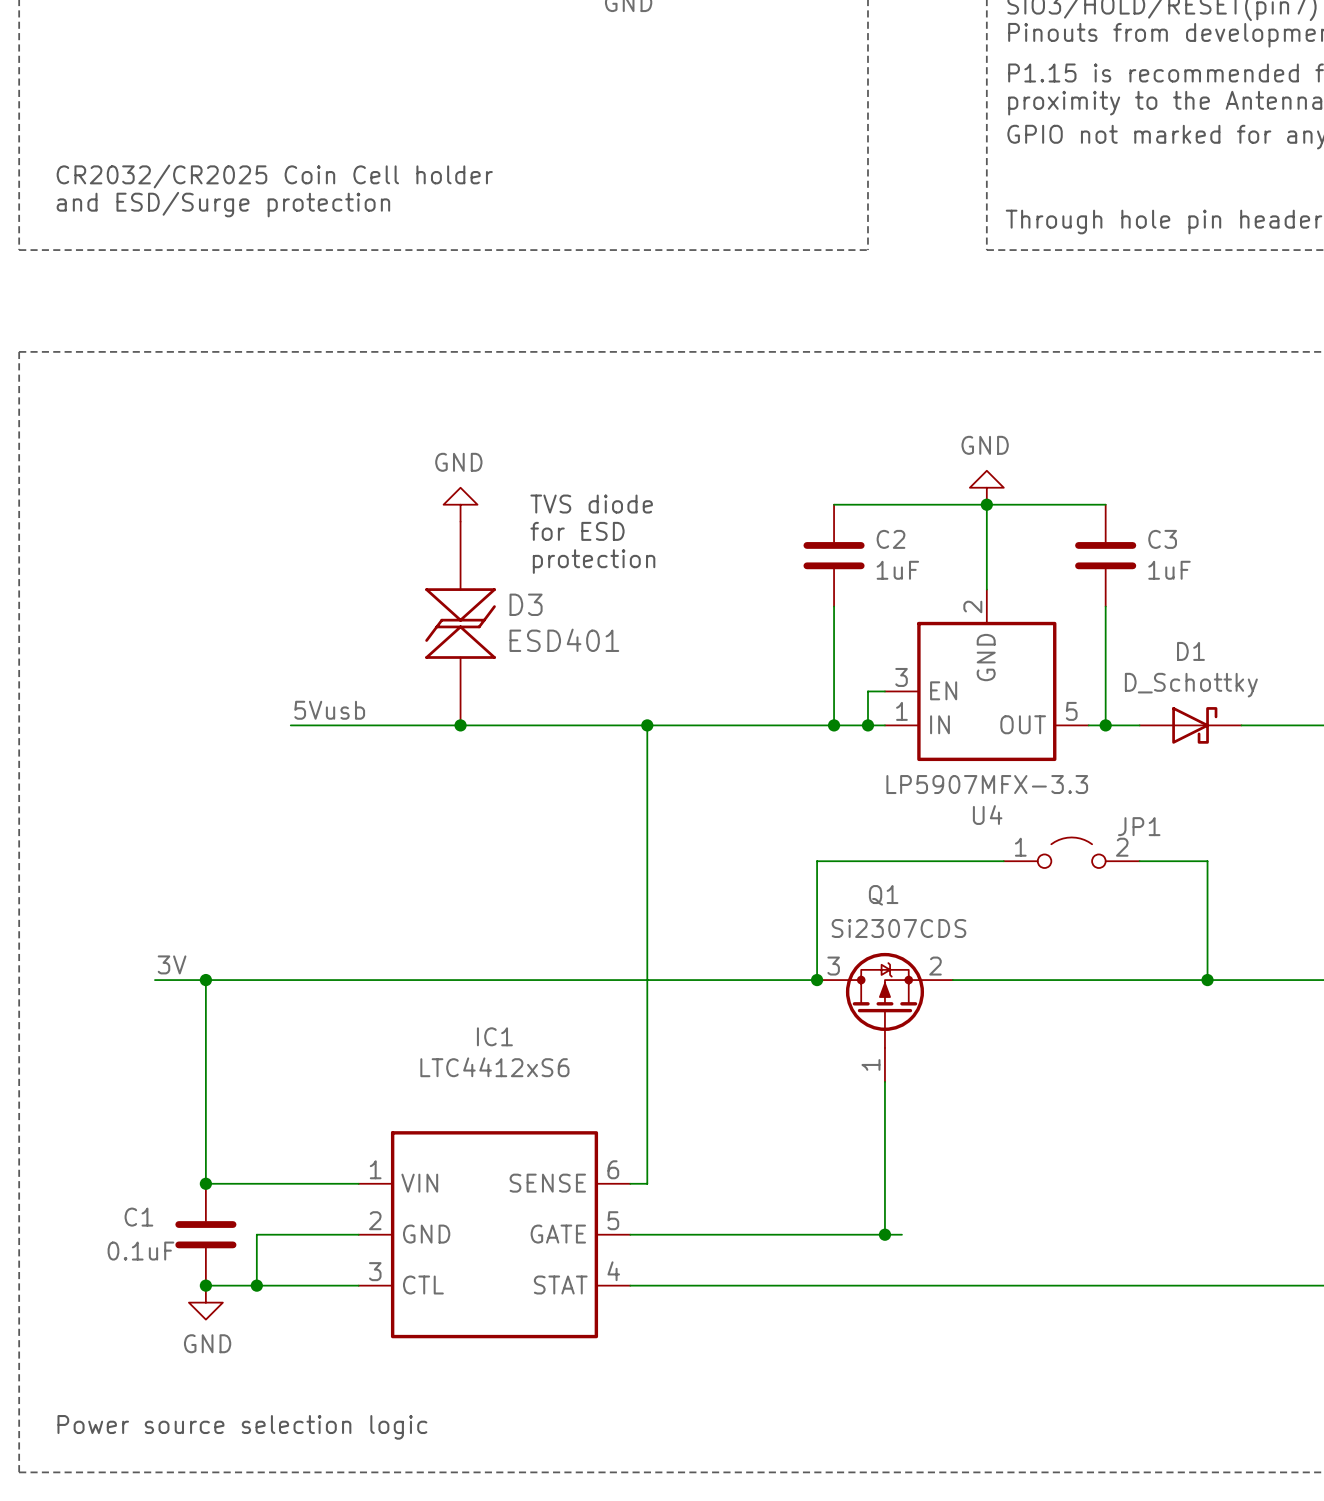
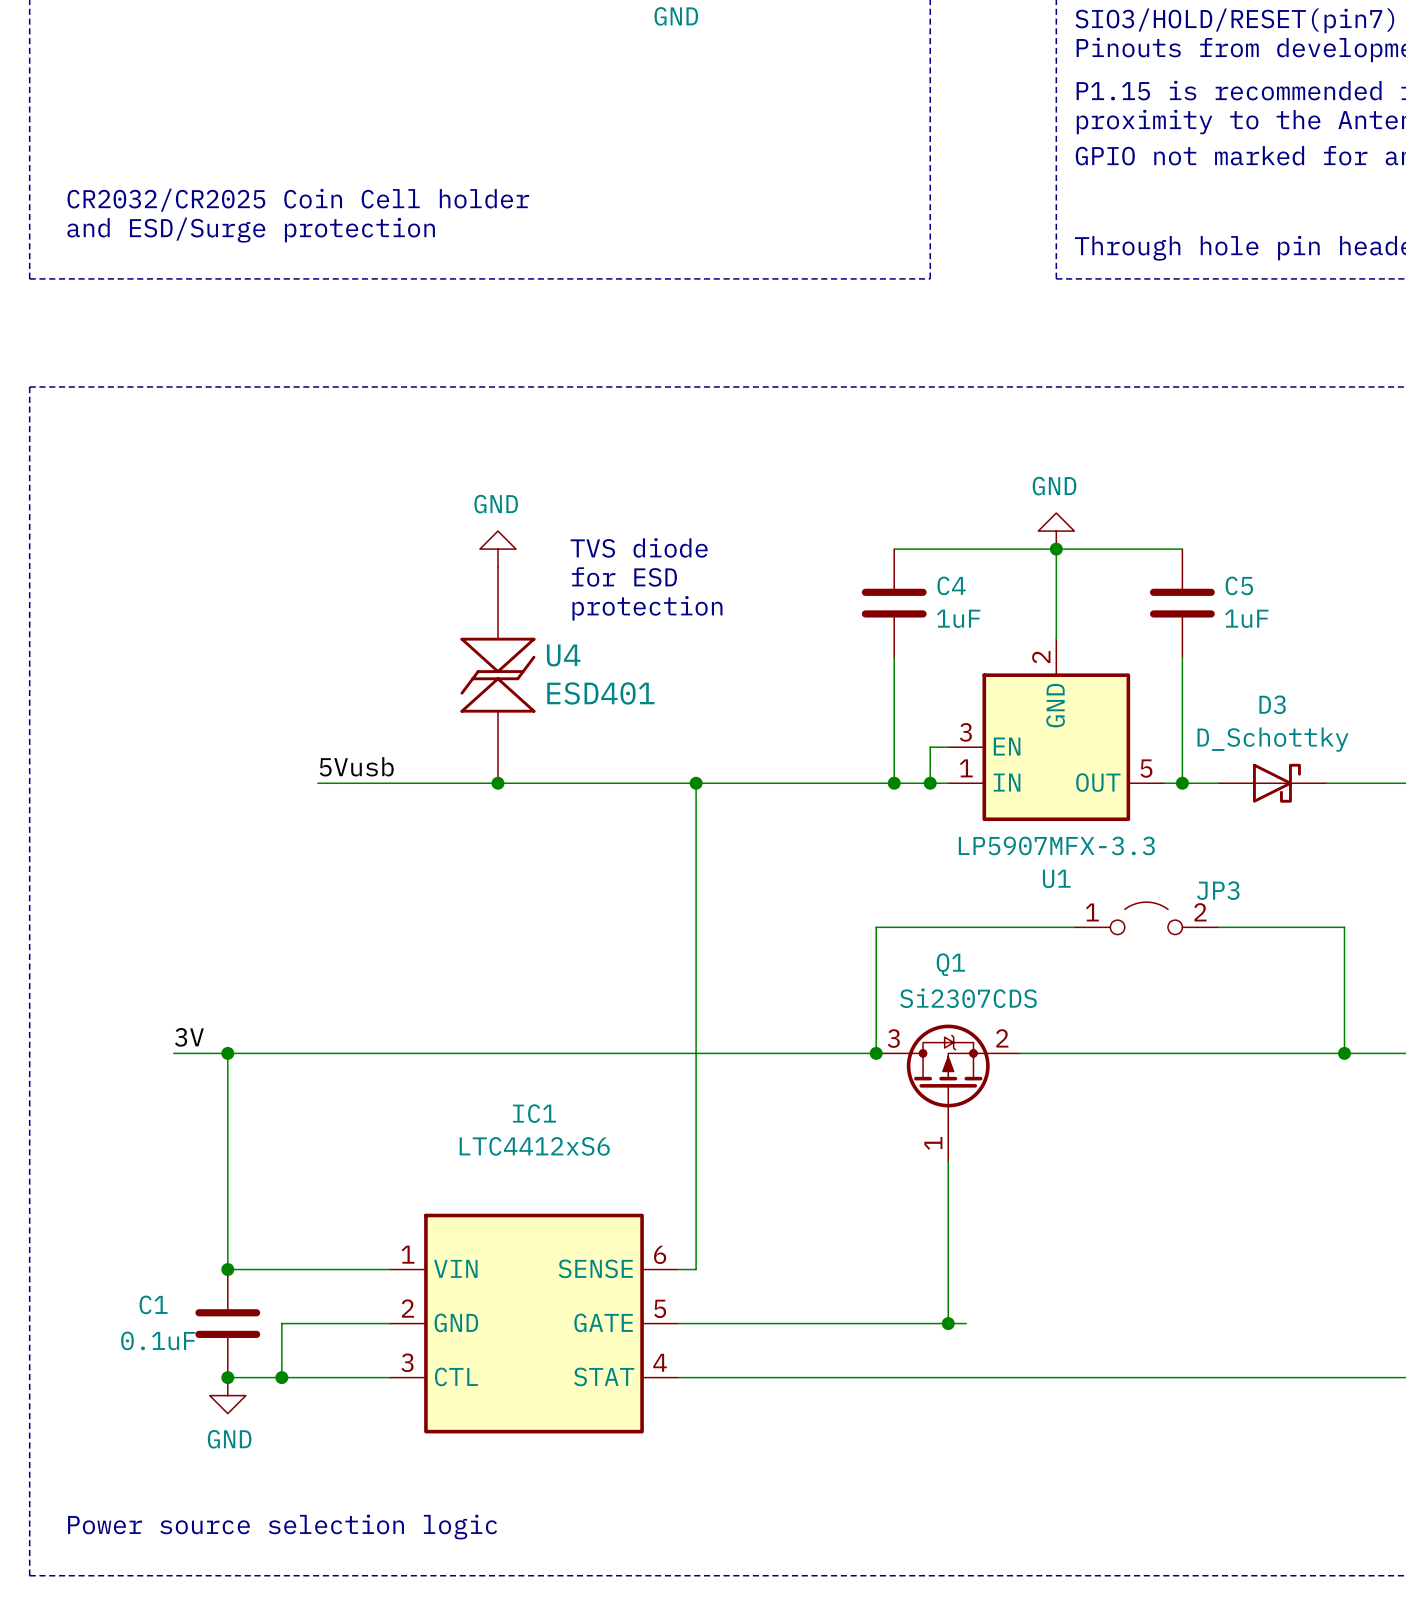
C2 name: C2 (891, 539) -> C4 (951, 585)
C3 name: C3 (1162, 539) -> C5 (1239, 585)
D3 name: D3 (526, 604) -> U4 (563, 655)
D1 name: D1 (1190, 651) -> D3 (1272, 704)
U4 name: U4 (987, 815) -> U1 (1056, 878)
JP1 name: JP1 (1139, 826) -> JP3 (1218, 890)
wire: (1207, 861) (1207, 980) -> (1290, 927) (1344, 927) (1344, 1053)
junction position: (1207, 980) -> (1344, 1053)

